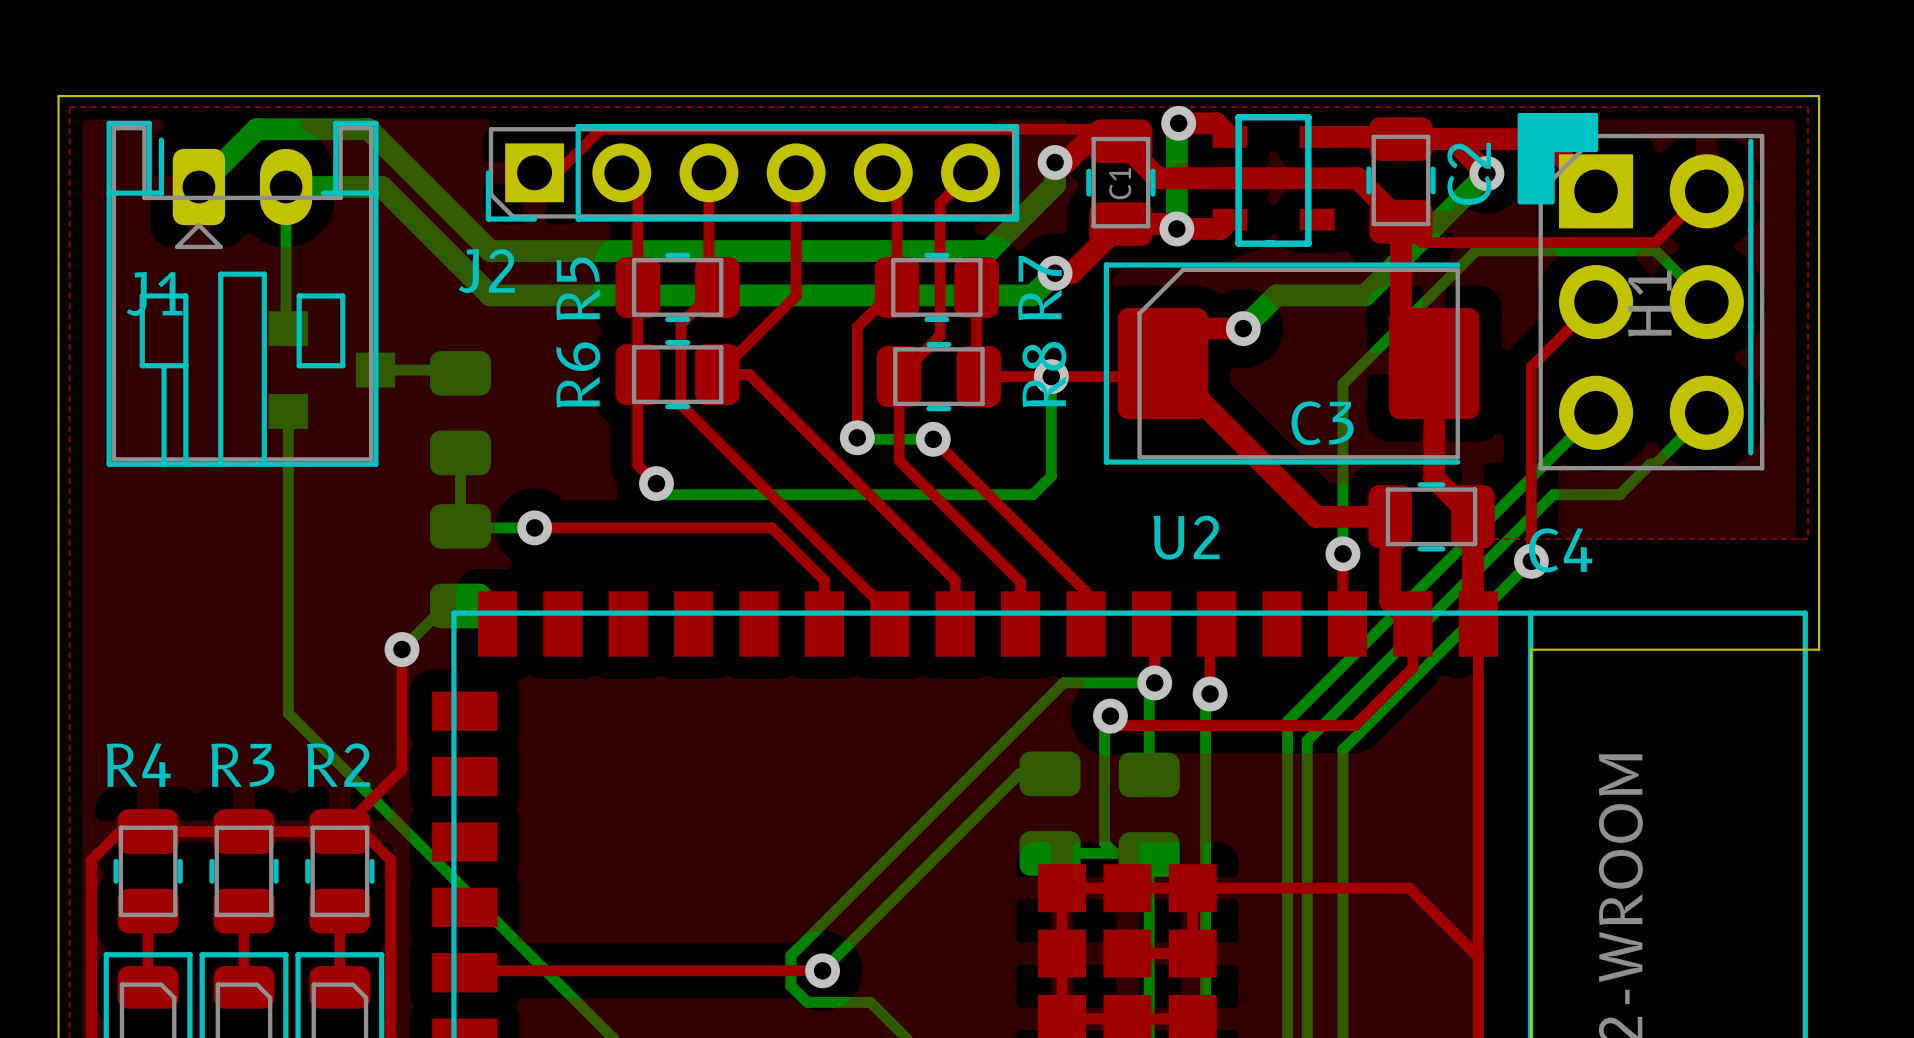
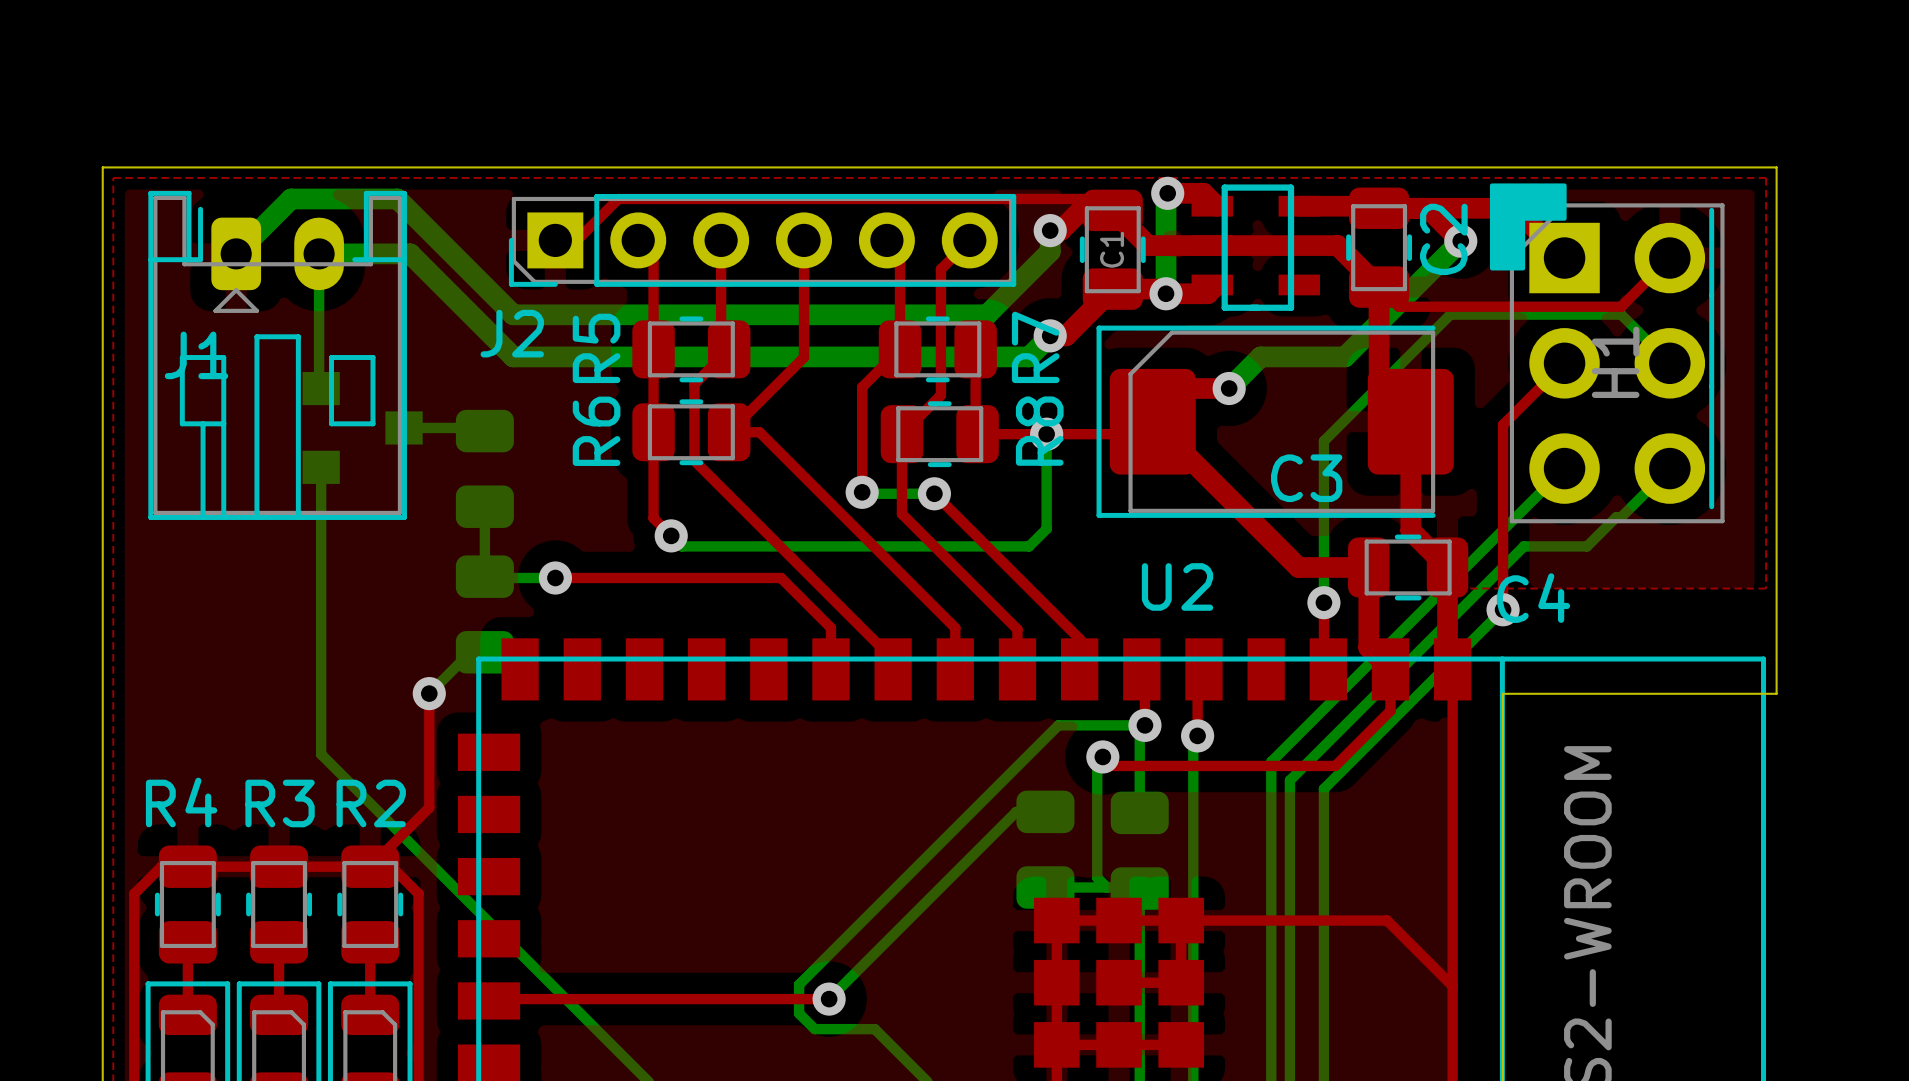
part footprint: [1212, 113, 1335, 247] -> [1191, 184, 1321, 311]

